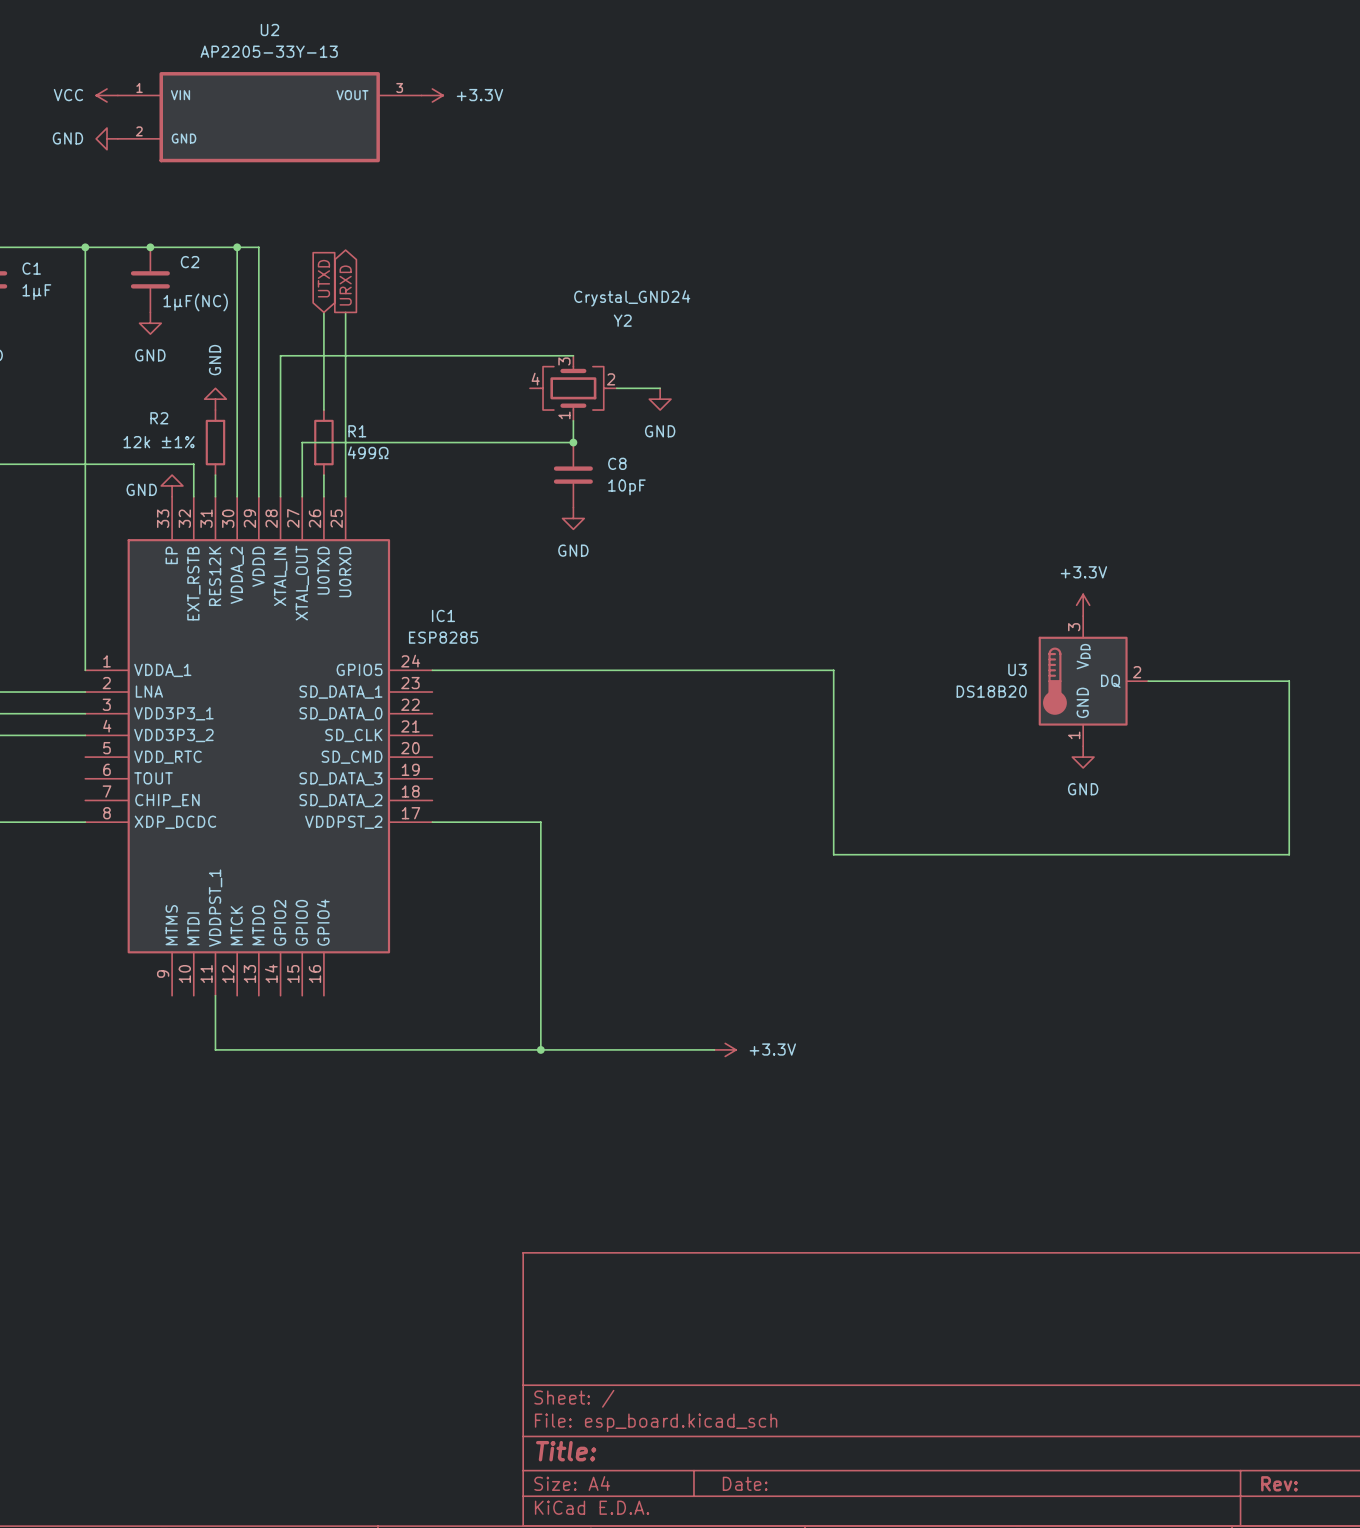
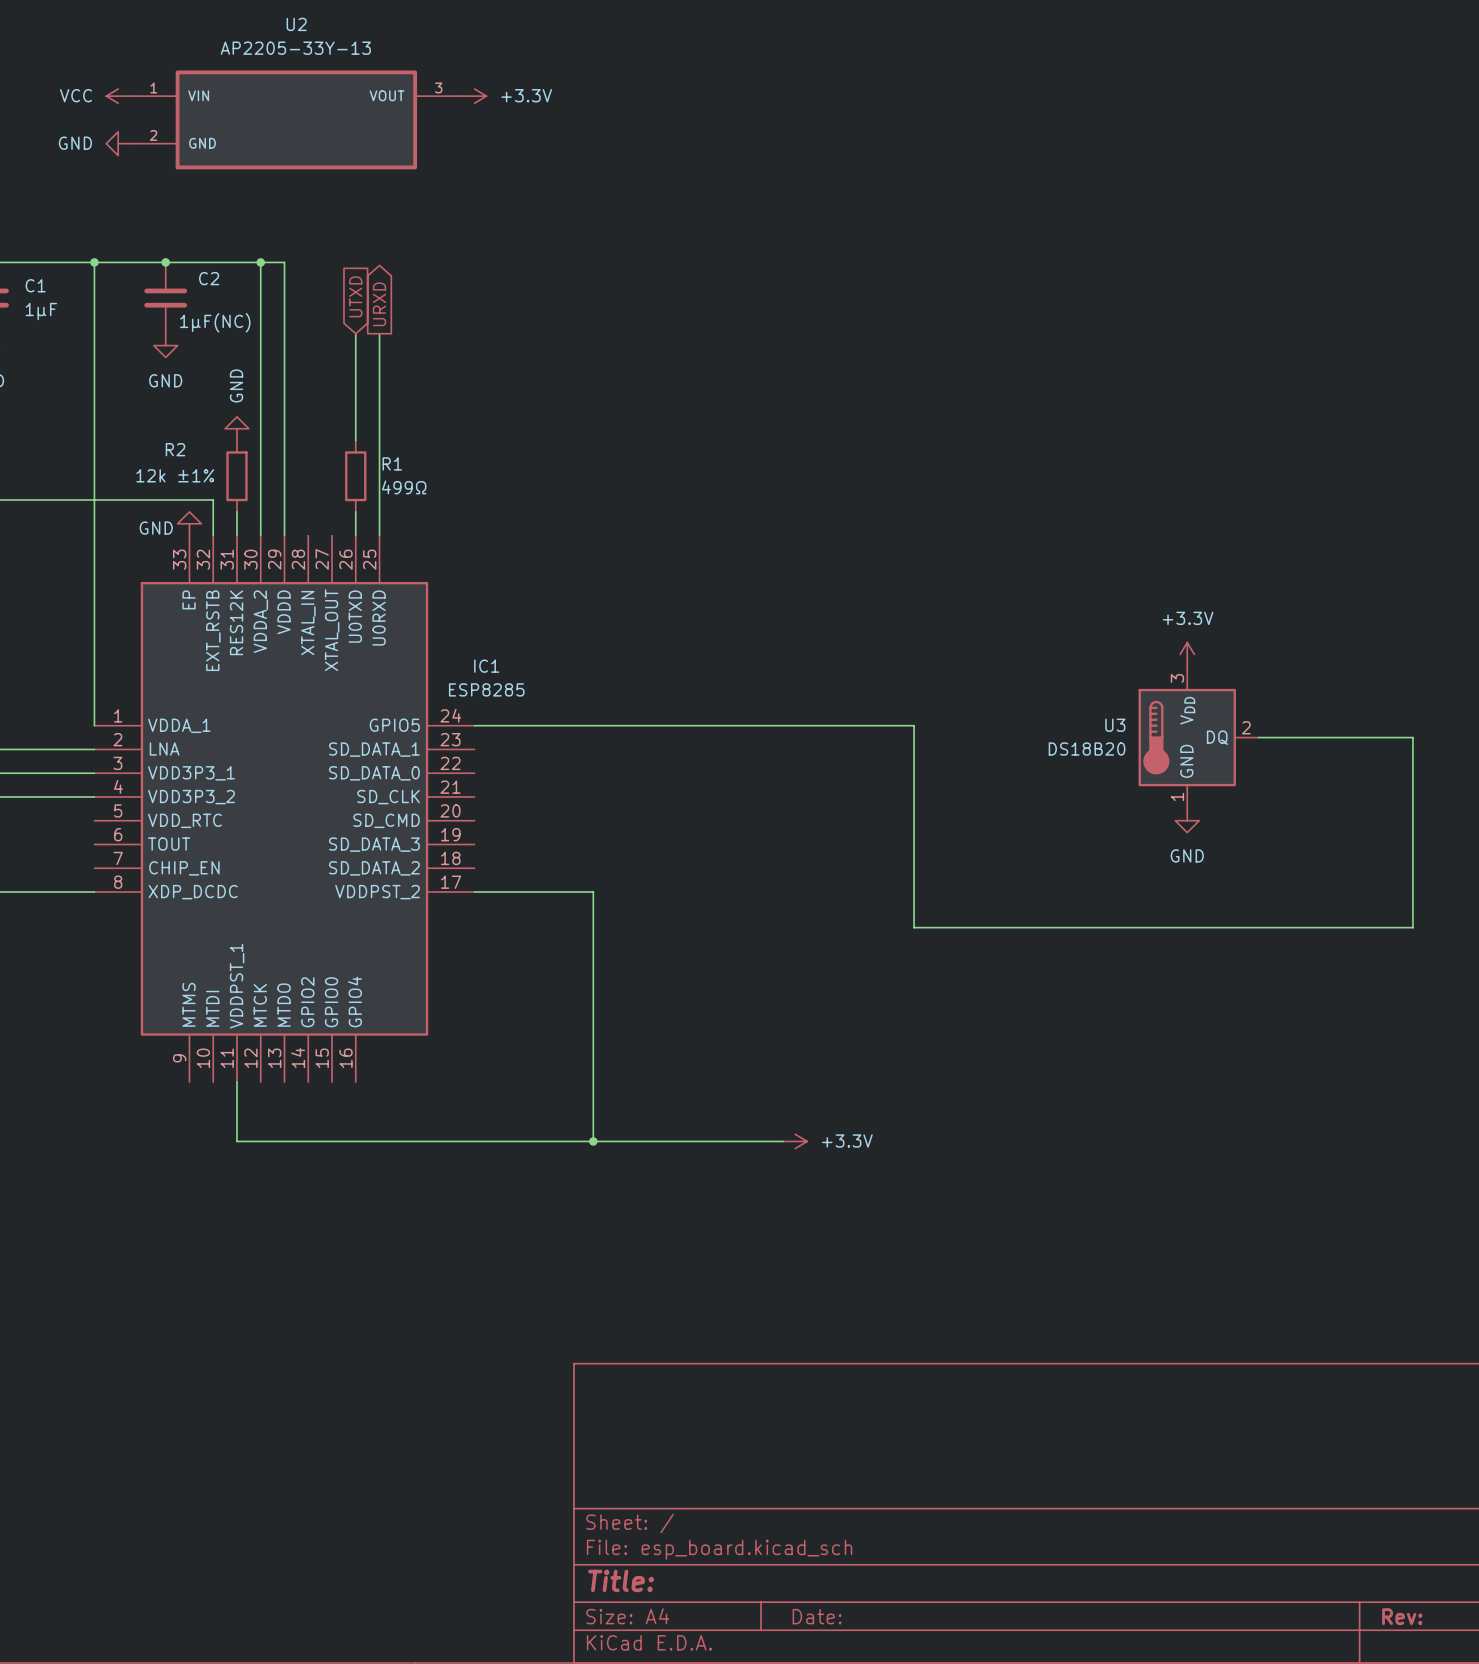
wire: (573, 355) (280, 355) (280, 496) -> none
Y2: Crystal_GND24 (573, 388) -> none
wire: (616, 388) (660, 388) -> none
power symbol: GND (660, 399) -> none
wire: (573, 420) (573, 442) (302, 442) (302, 496) -> none
junction: (573, 442) -> none
C8: 10pF (573, 475) -> none
power symbol: GND (573, 518) -> none

